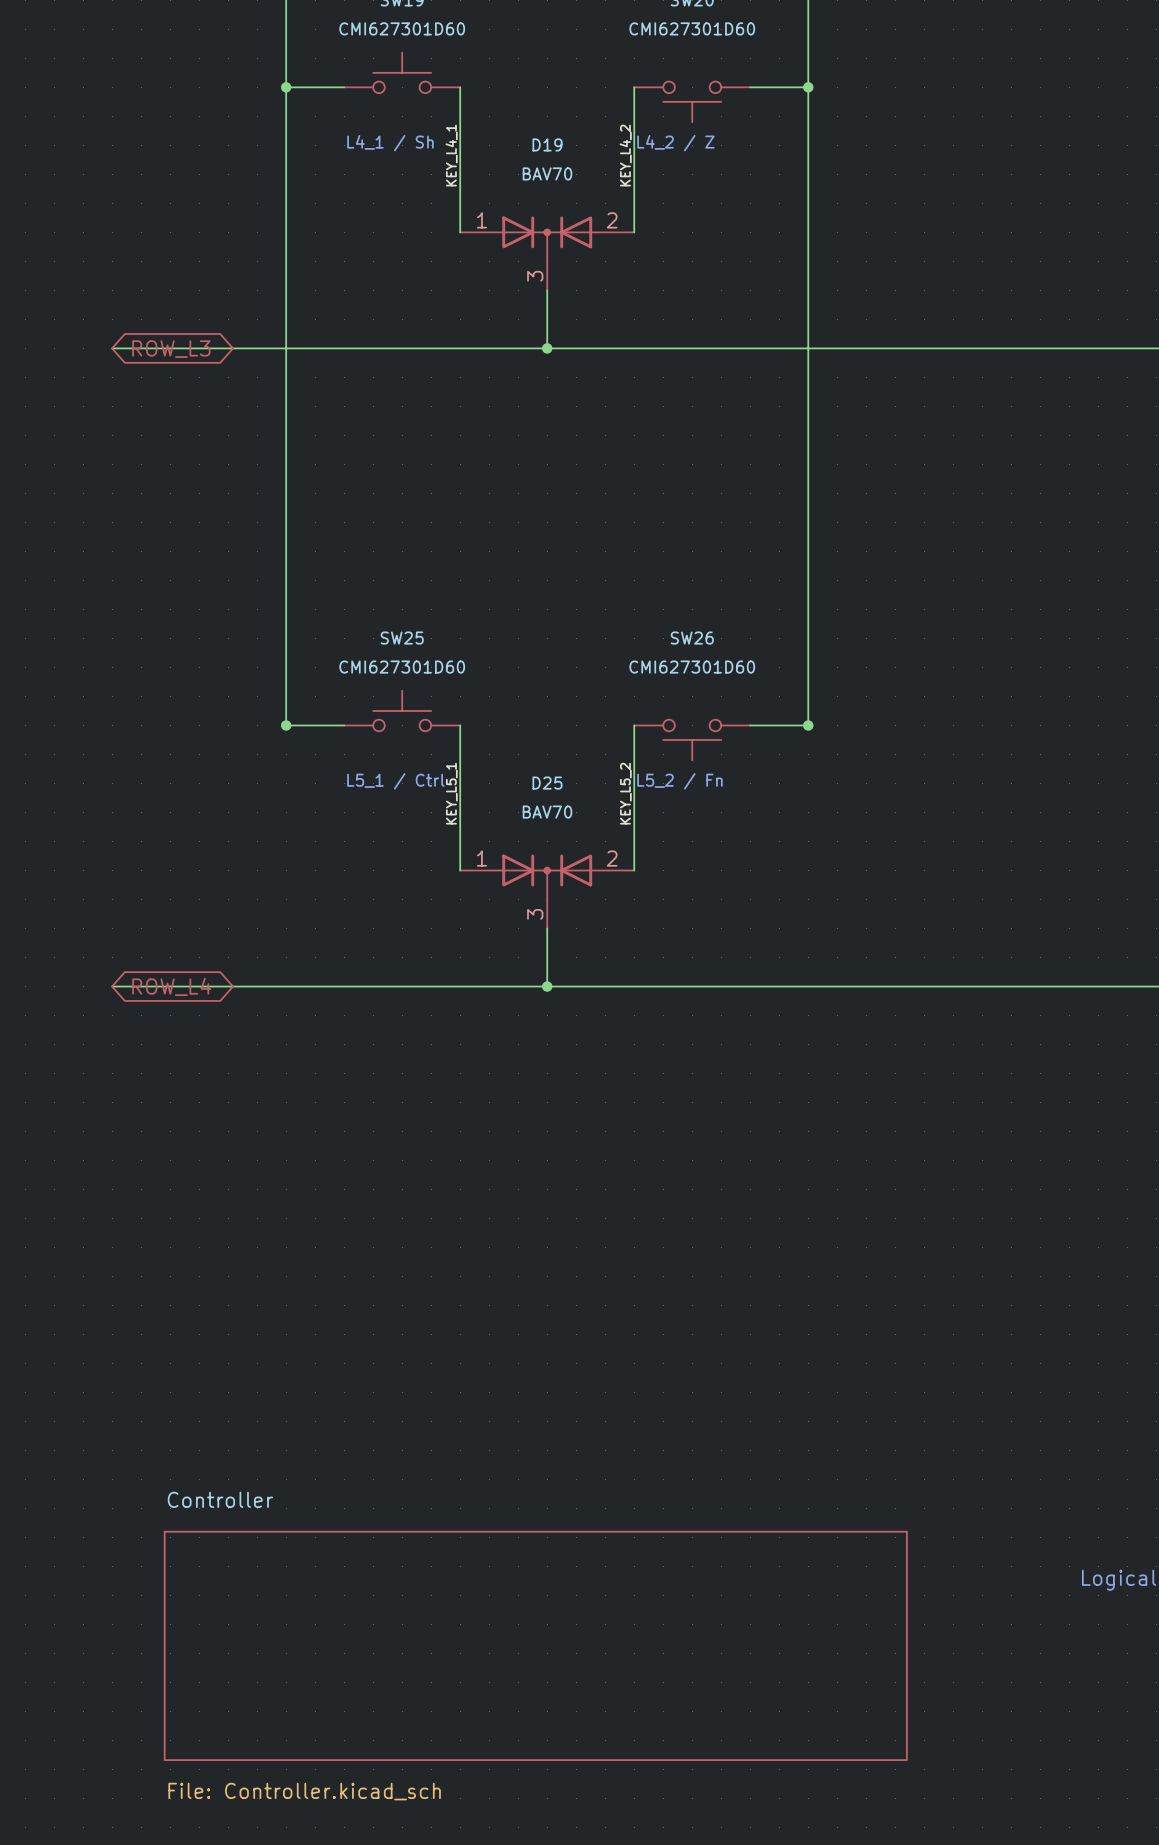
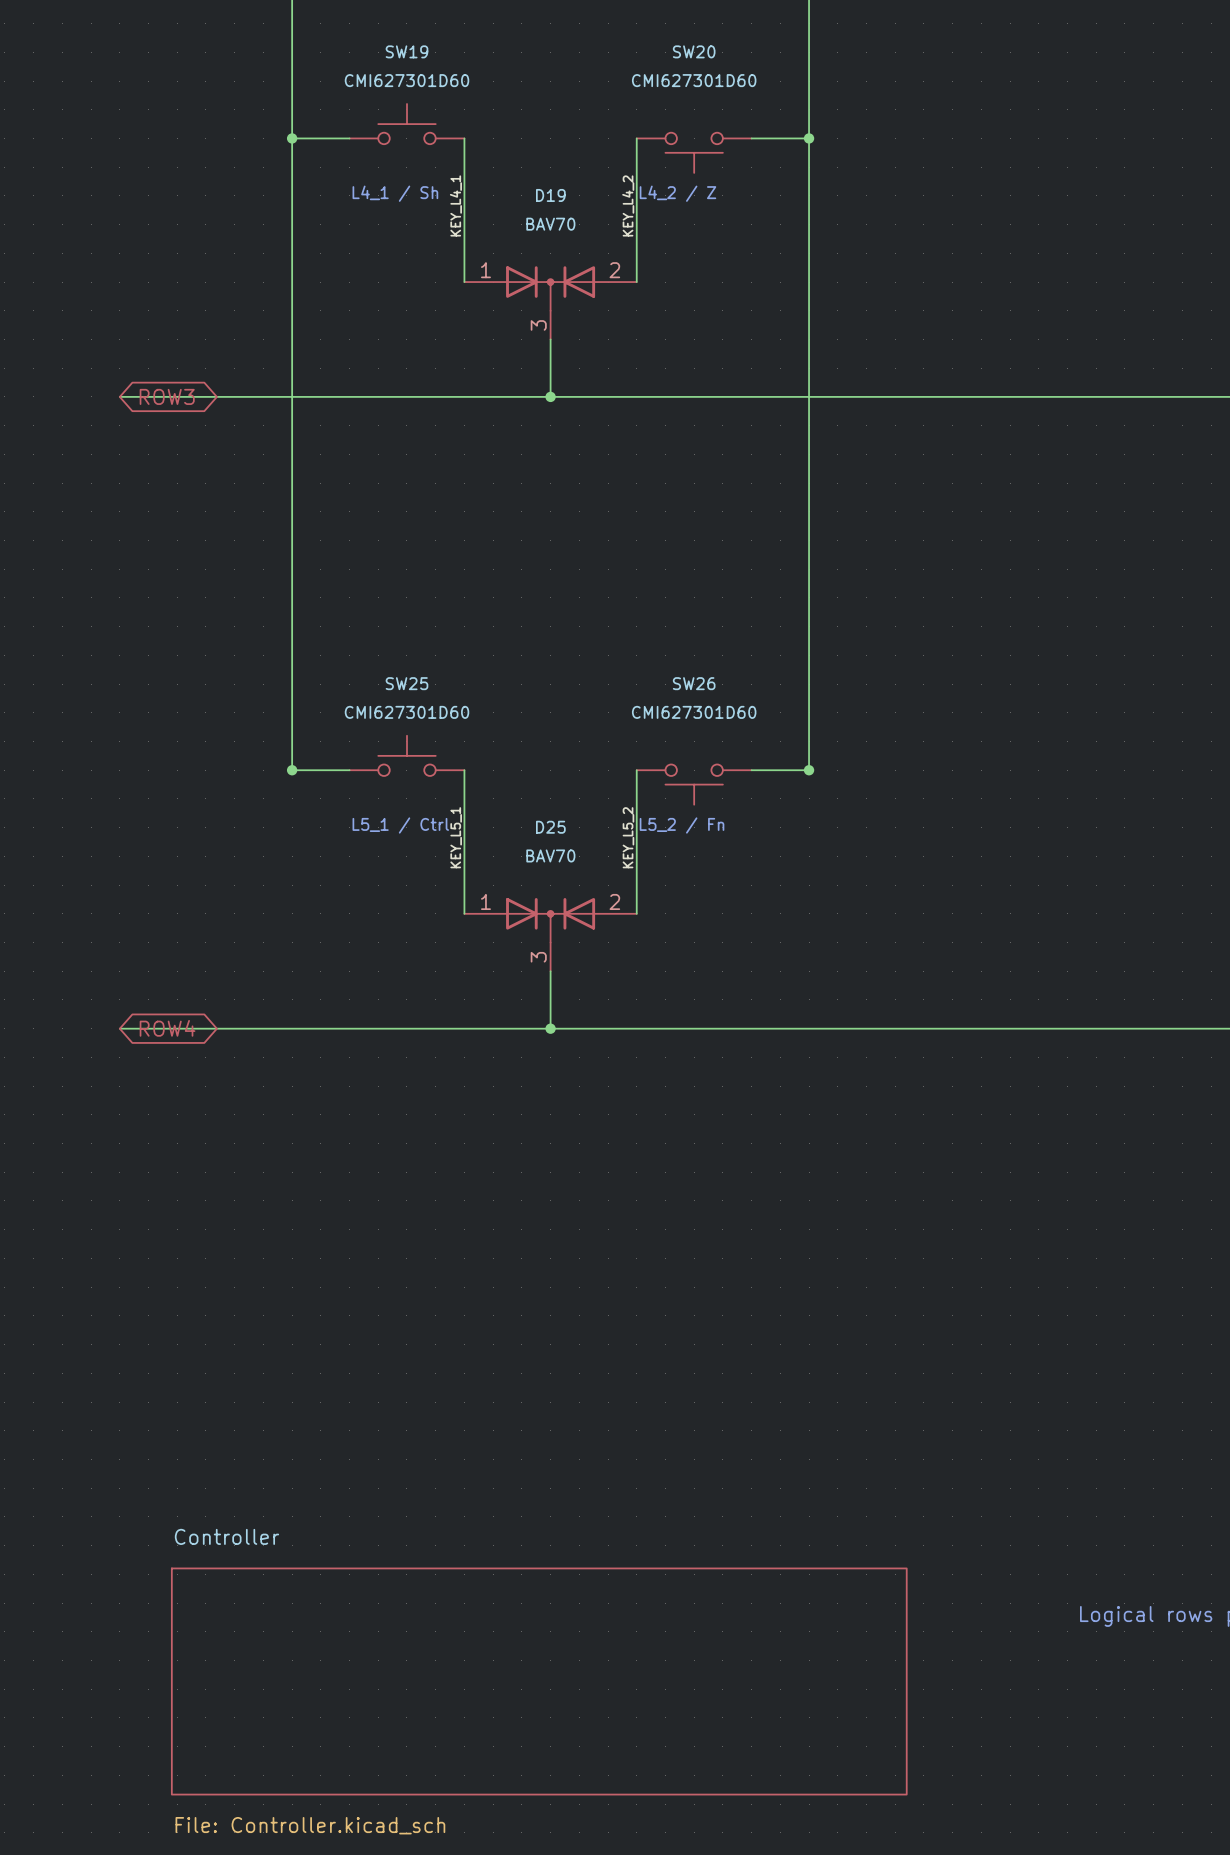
global label: ROW_L3 (171, 349) -> ROW3 (167, 396)
global label: ROW_L4 (171, 986) -> ROW4 (167, 1028)

